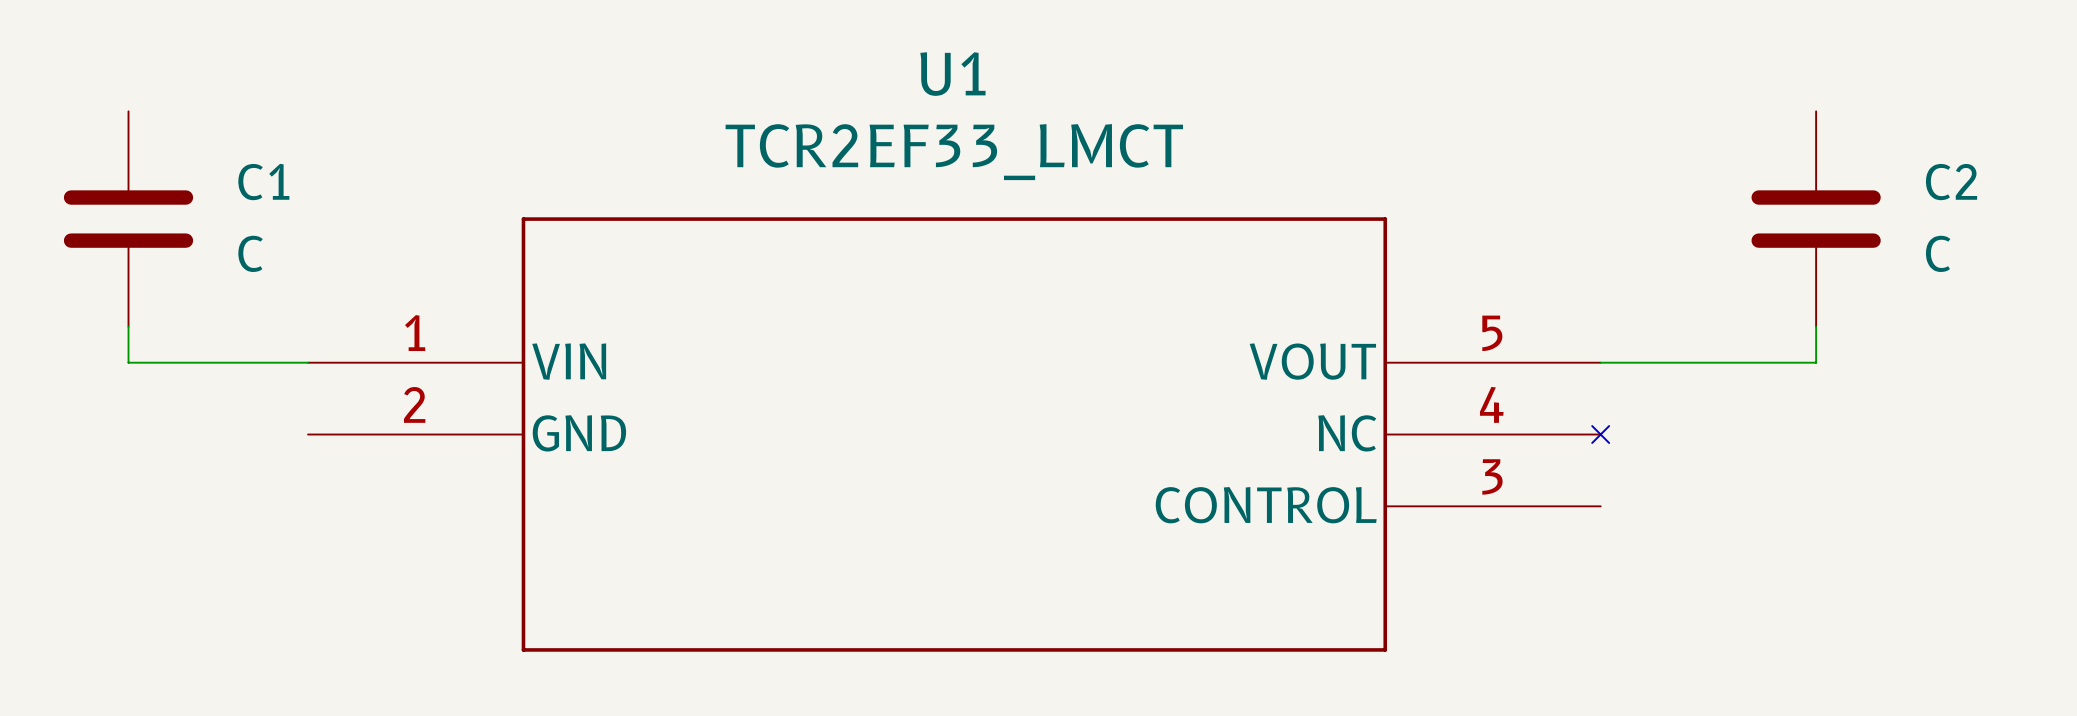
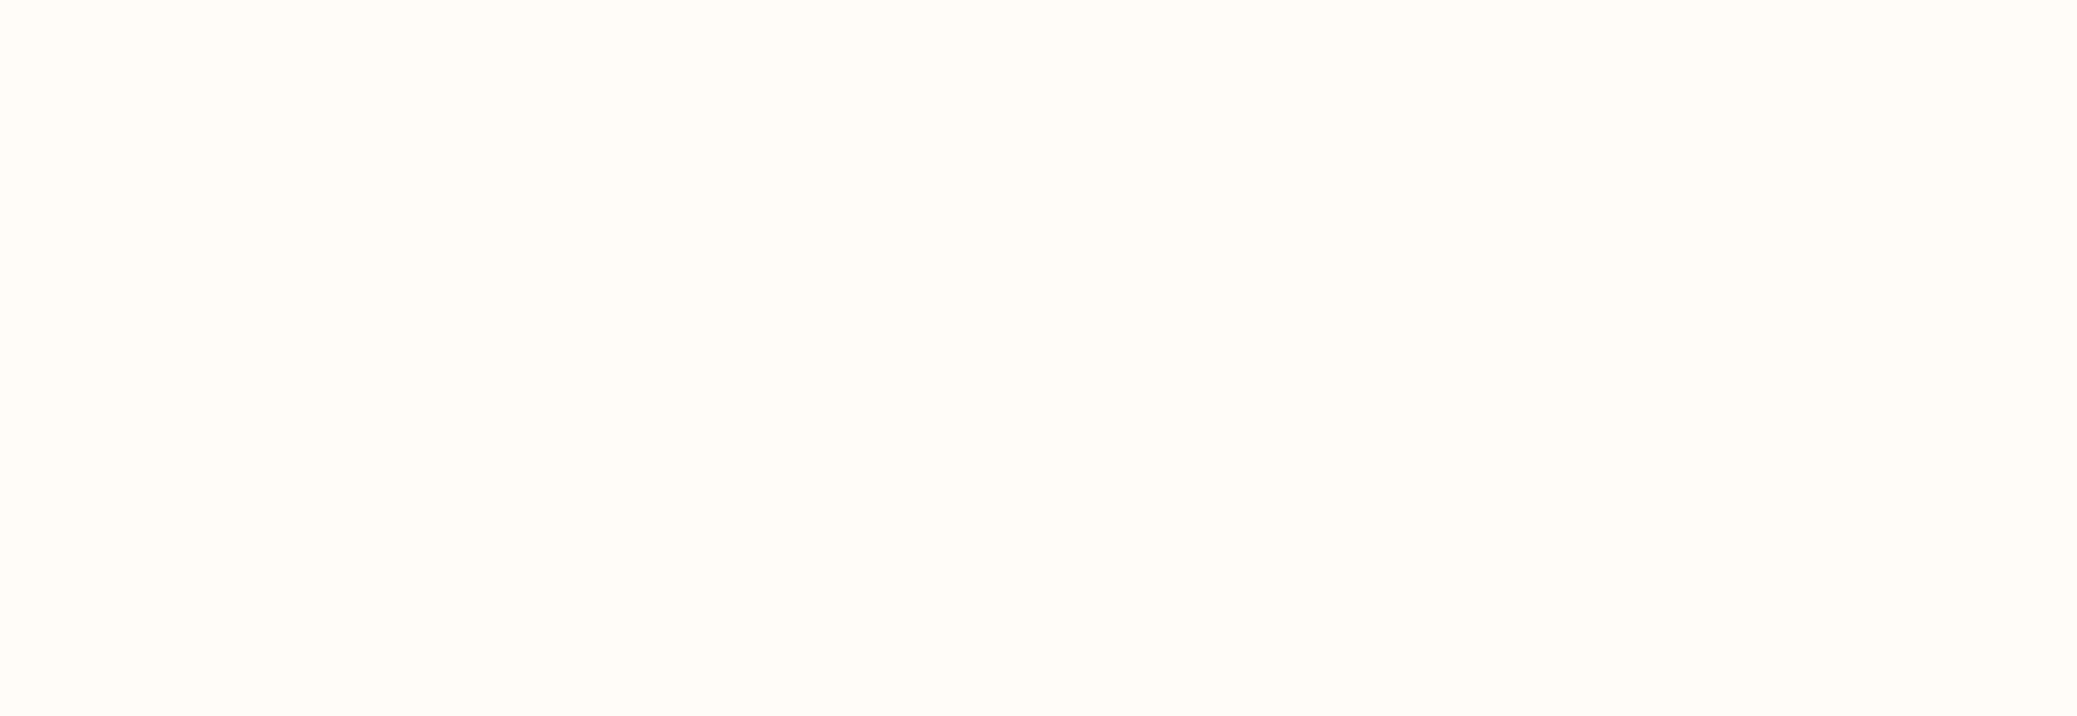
C1: C (128, 219) -> none
C2: C (1816, 219) -> none
wire: (128, 326) (128, 362) (308, 362) -> none
wire: (1816, 326) (1816, 362) (1600, 362) -> none
U1: TCR2EF33_LMCT (958, 434) -> none

